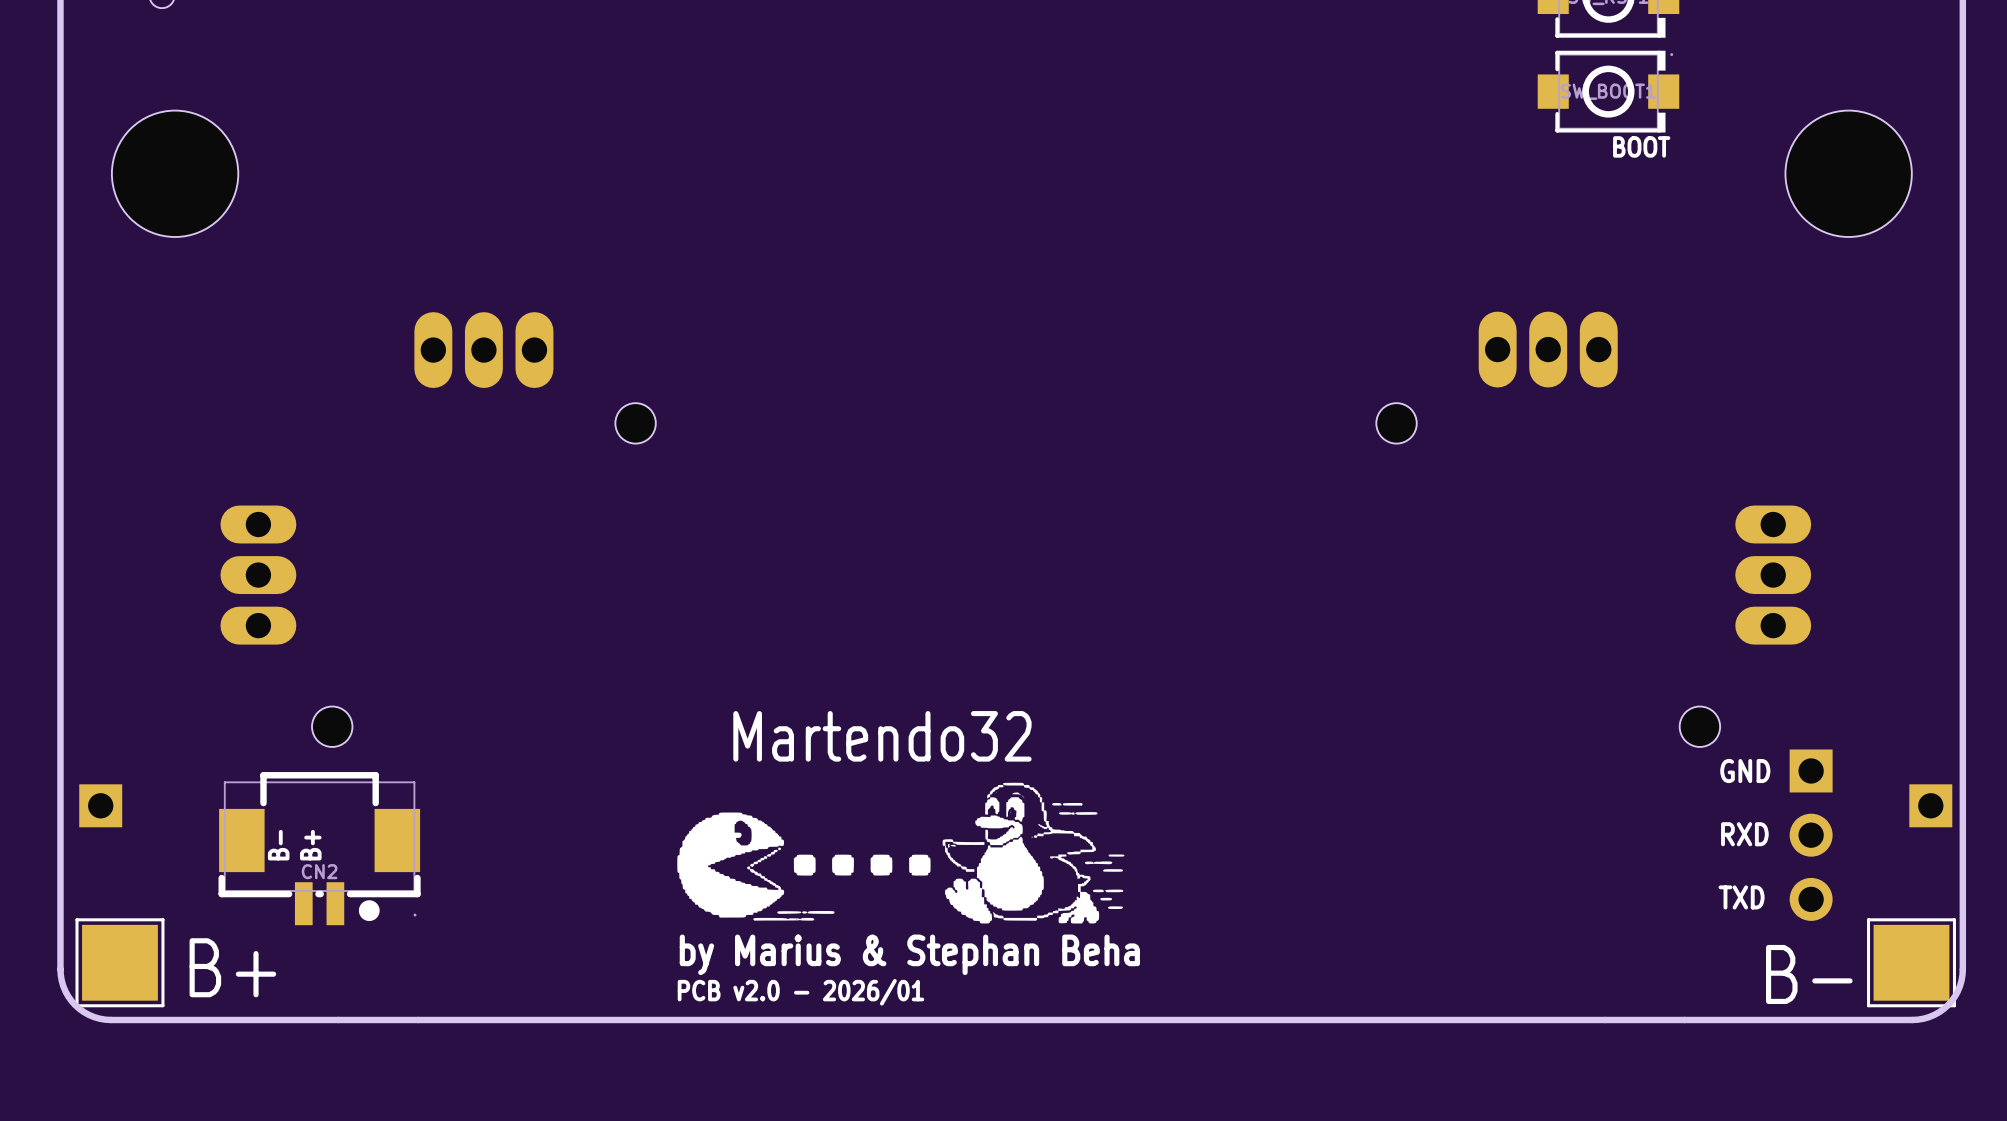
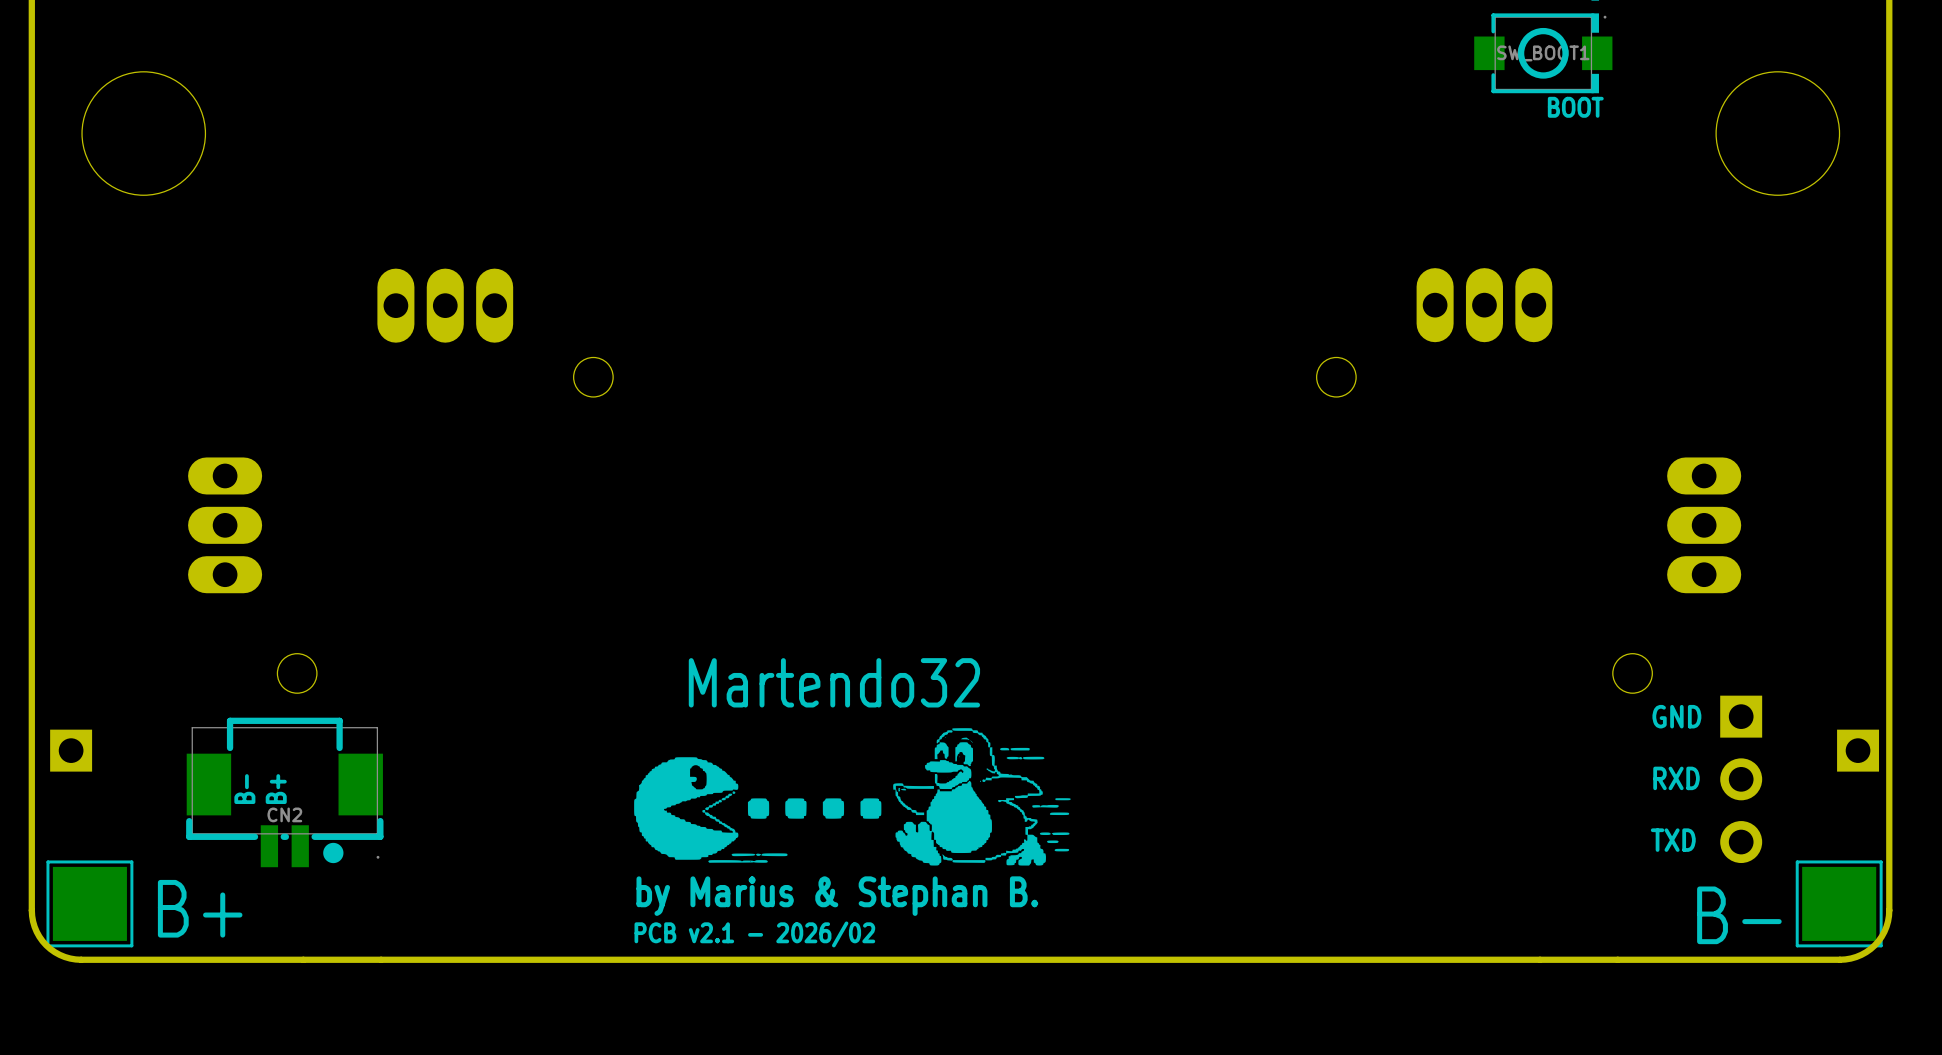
text: by Marius & Stephan Beha (909, 954) -> by Marius & Stephan B. (837, 896)
text: PCB v2.0 - 2026/01 (800, 992) -> PCB v2.1 - 2026/02 (754, 934)

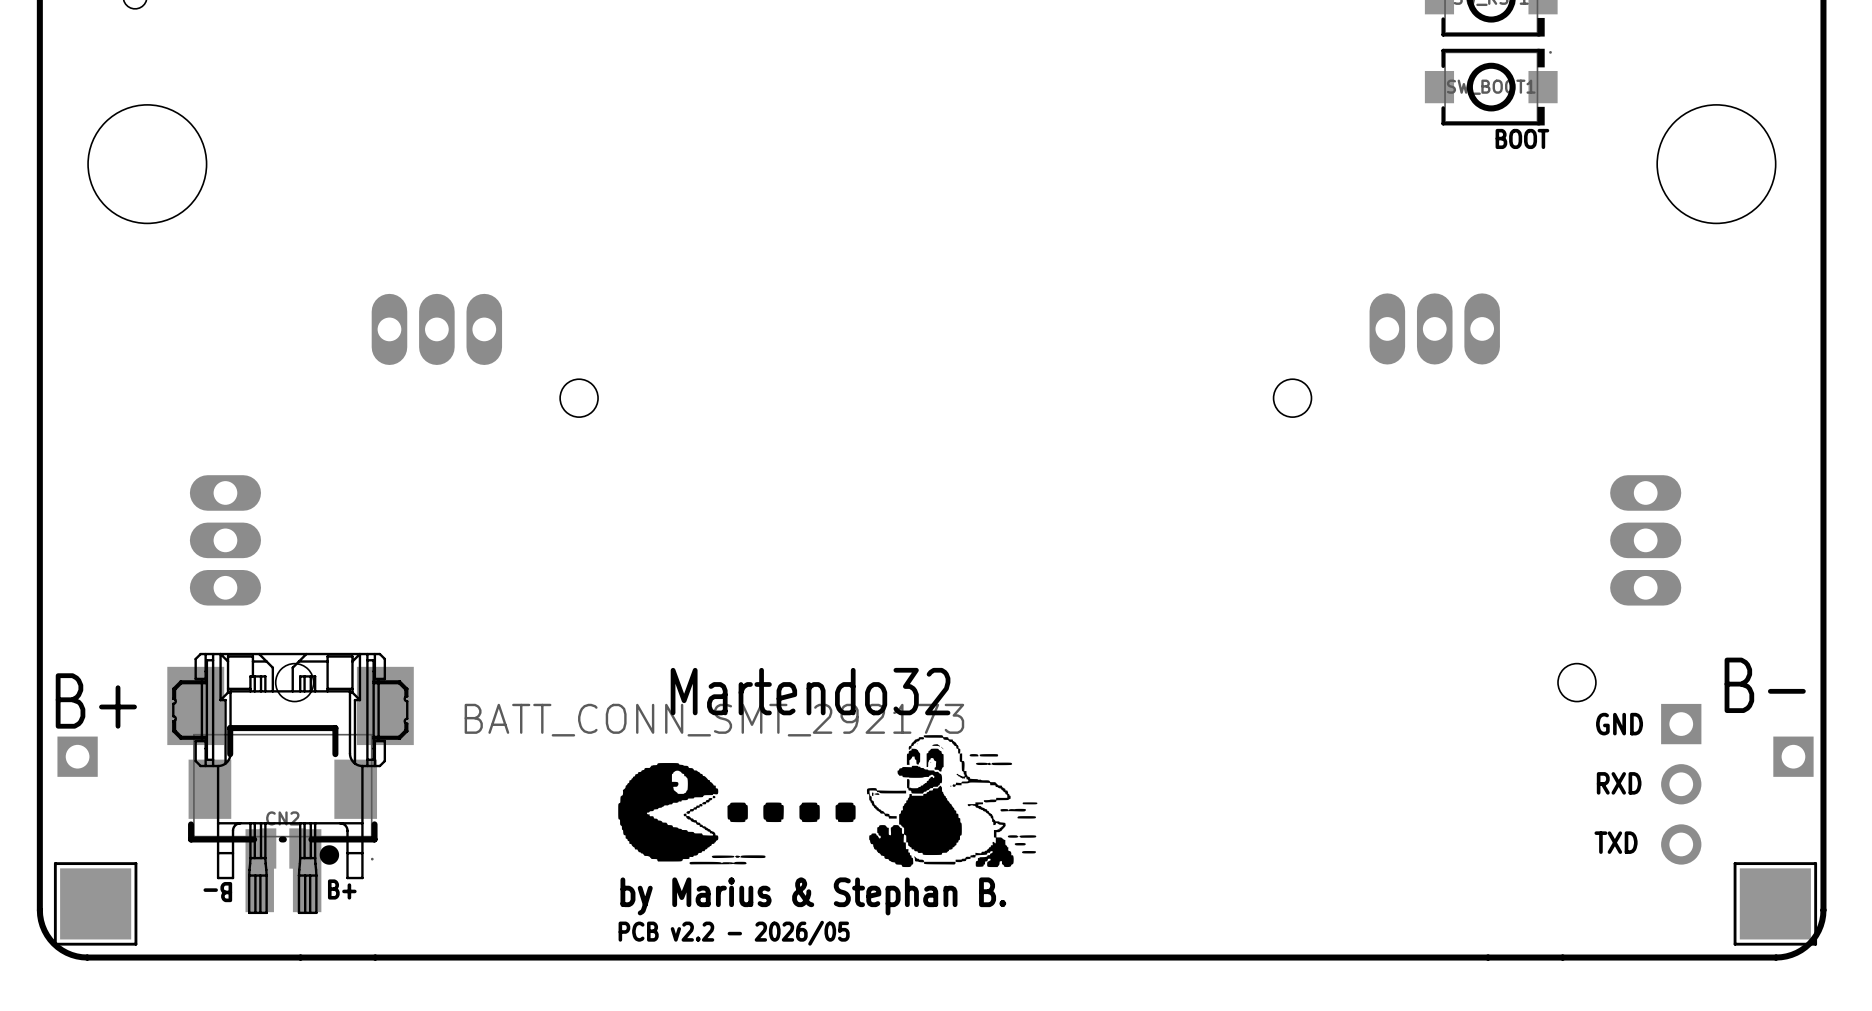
text: none -> B+ (96, 700)
part: none -> BATT_CONN_SMT_292173 (290, 783)
text rotation: 0° (244, 789) -> 90° counterclockwise (217, 892)
text position: B- (244, 789) -> B- (217, 892)
text: B+ (276, 789) -> none
text: none -> B+ (342, 889)
text: B+ (200, 908) -> none
text position: B- (1739, 915) -> B- (1765, 685)
text: PCB v2.1 - 2026/02 (754, 934) -> PCB v2.2 - 2026/05 (734, 933)

